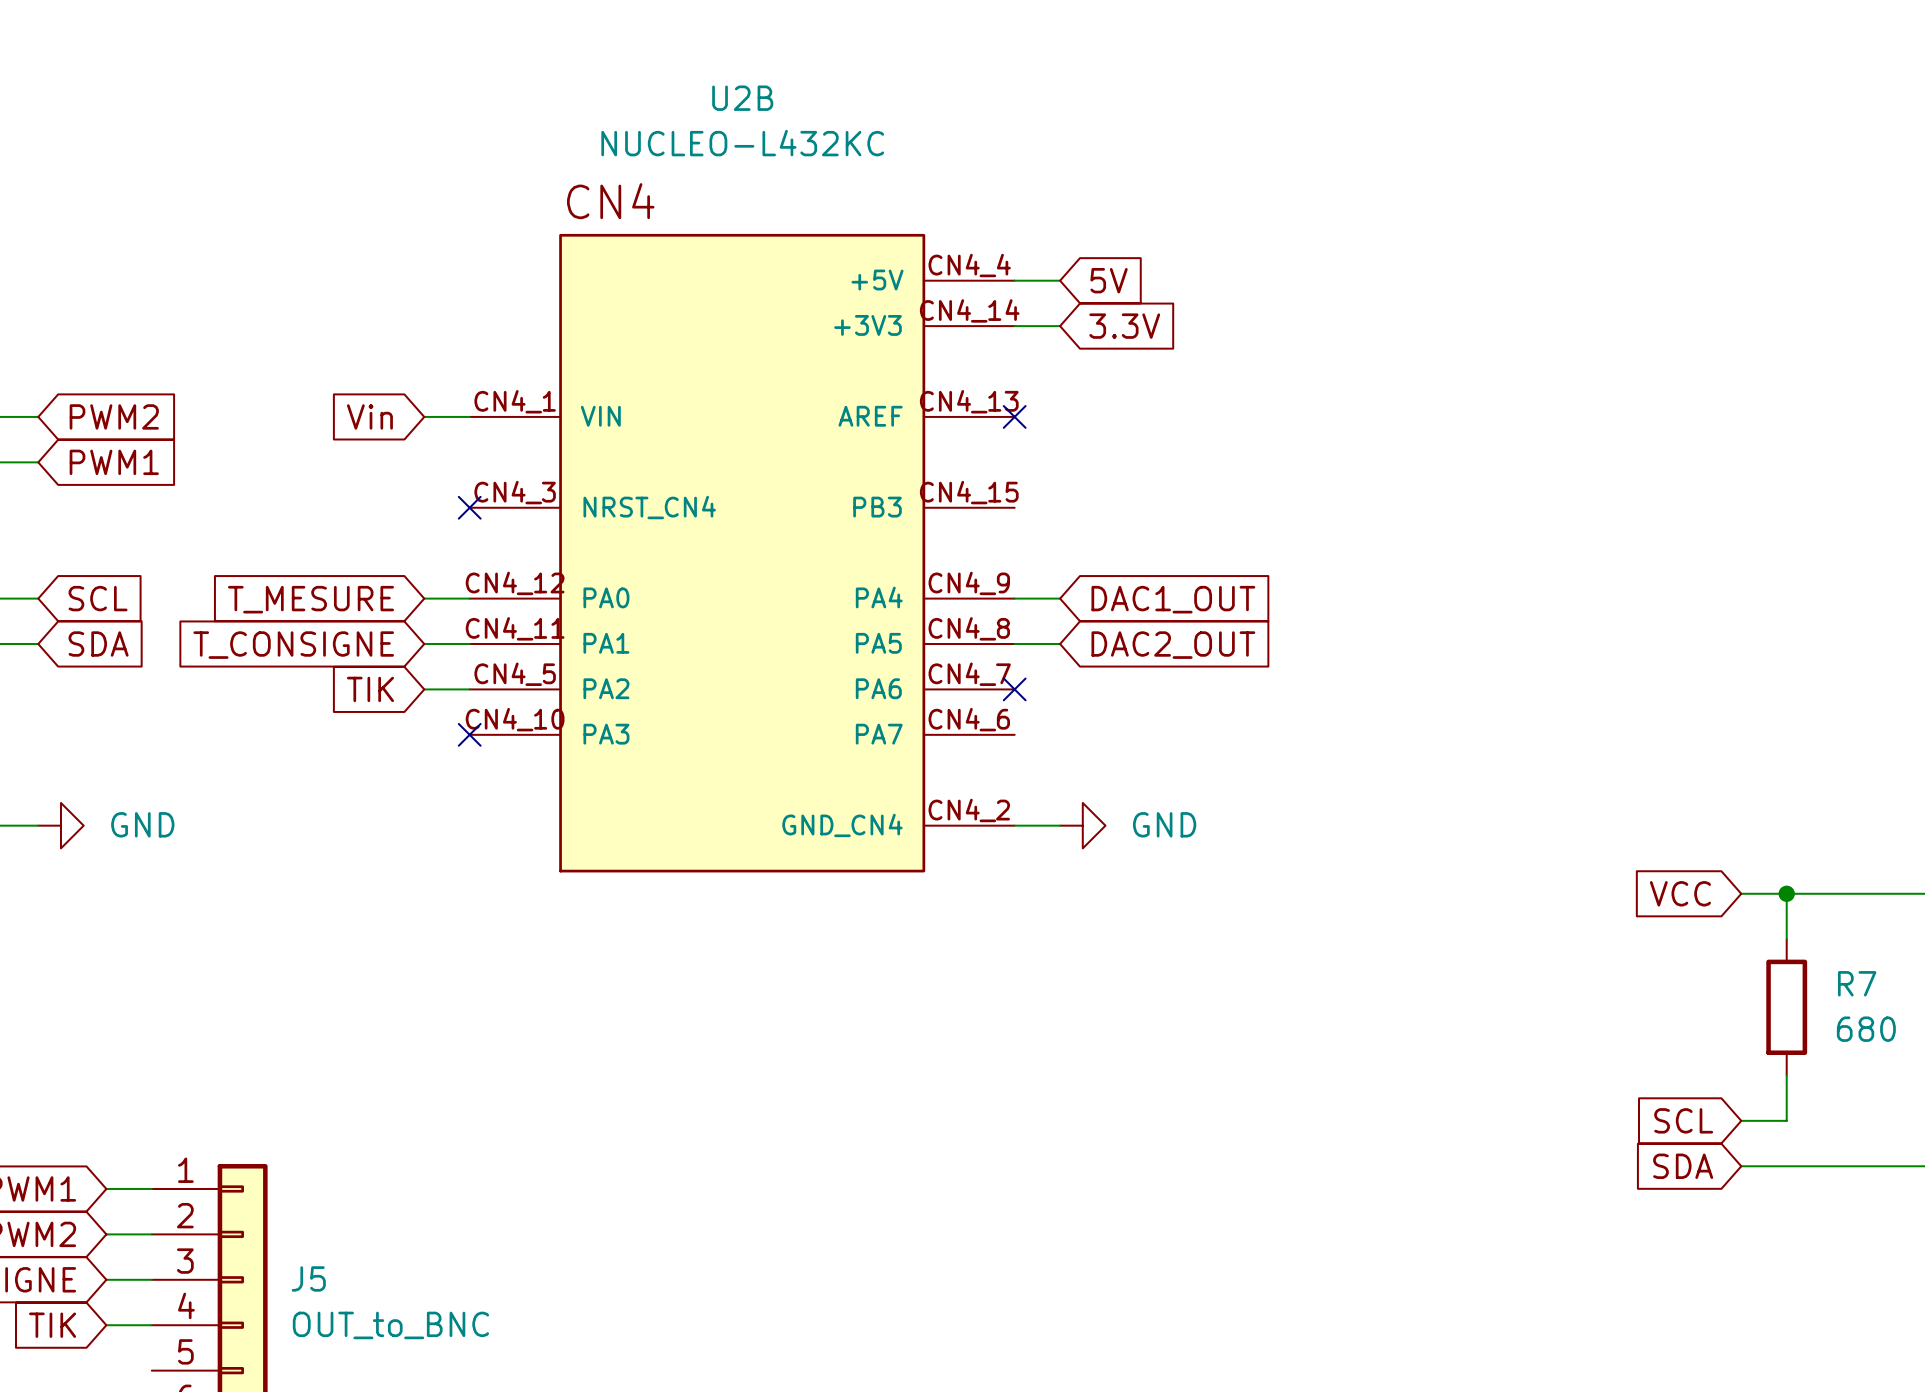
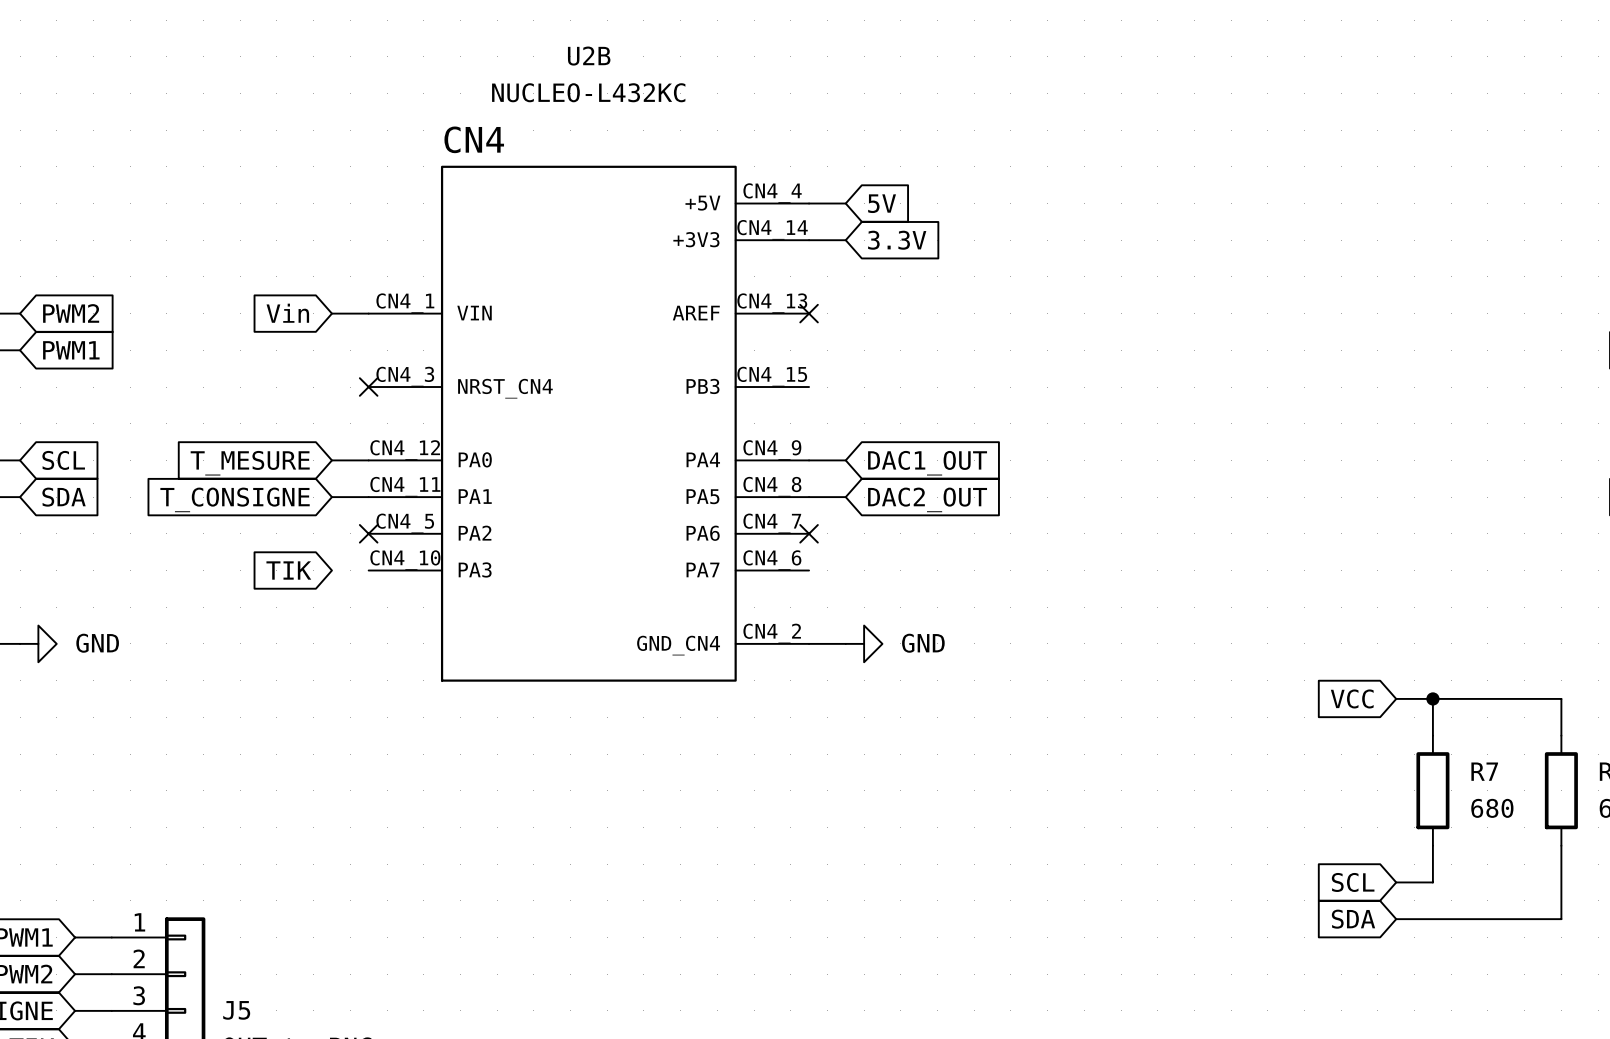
global label position: TIK (370, 689) -> TIK (288, 570)
wire: (424, 689) (469, 689) -> none
no-connect mark position: (469, 734) -> (368, 533)

